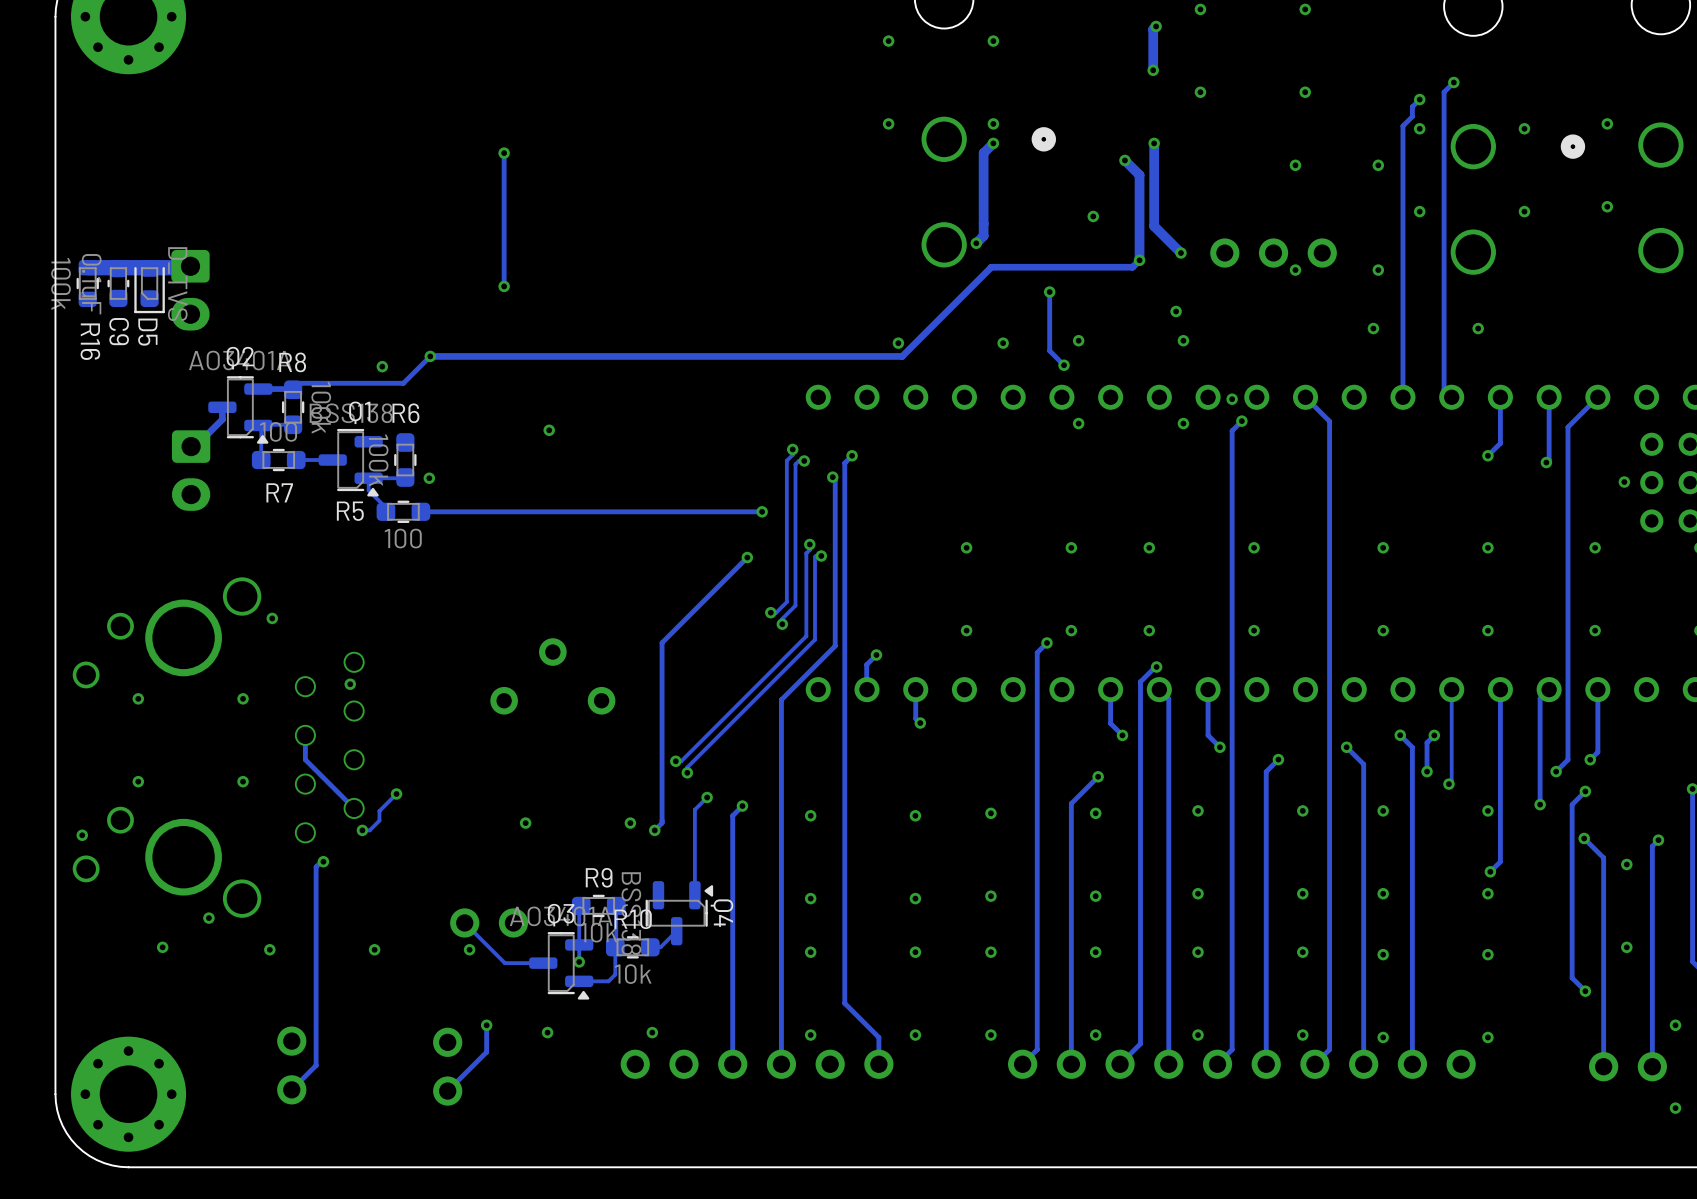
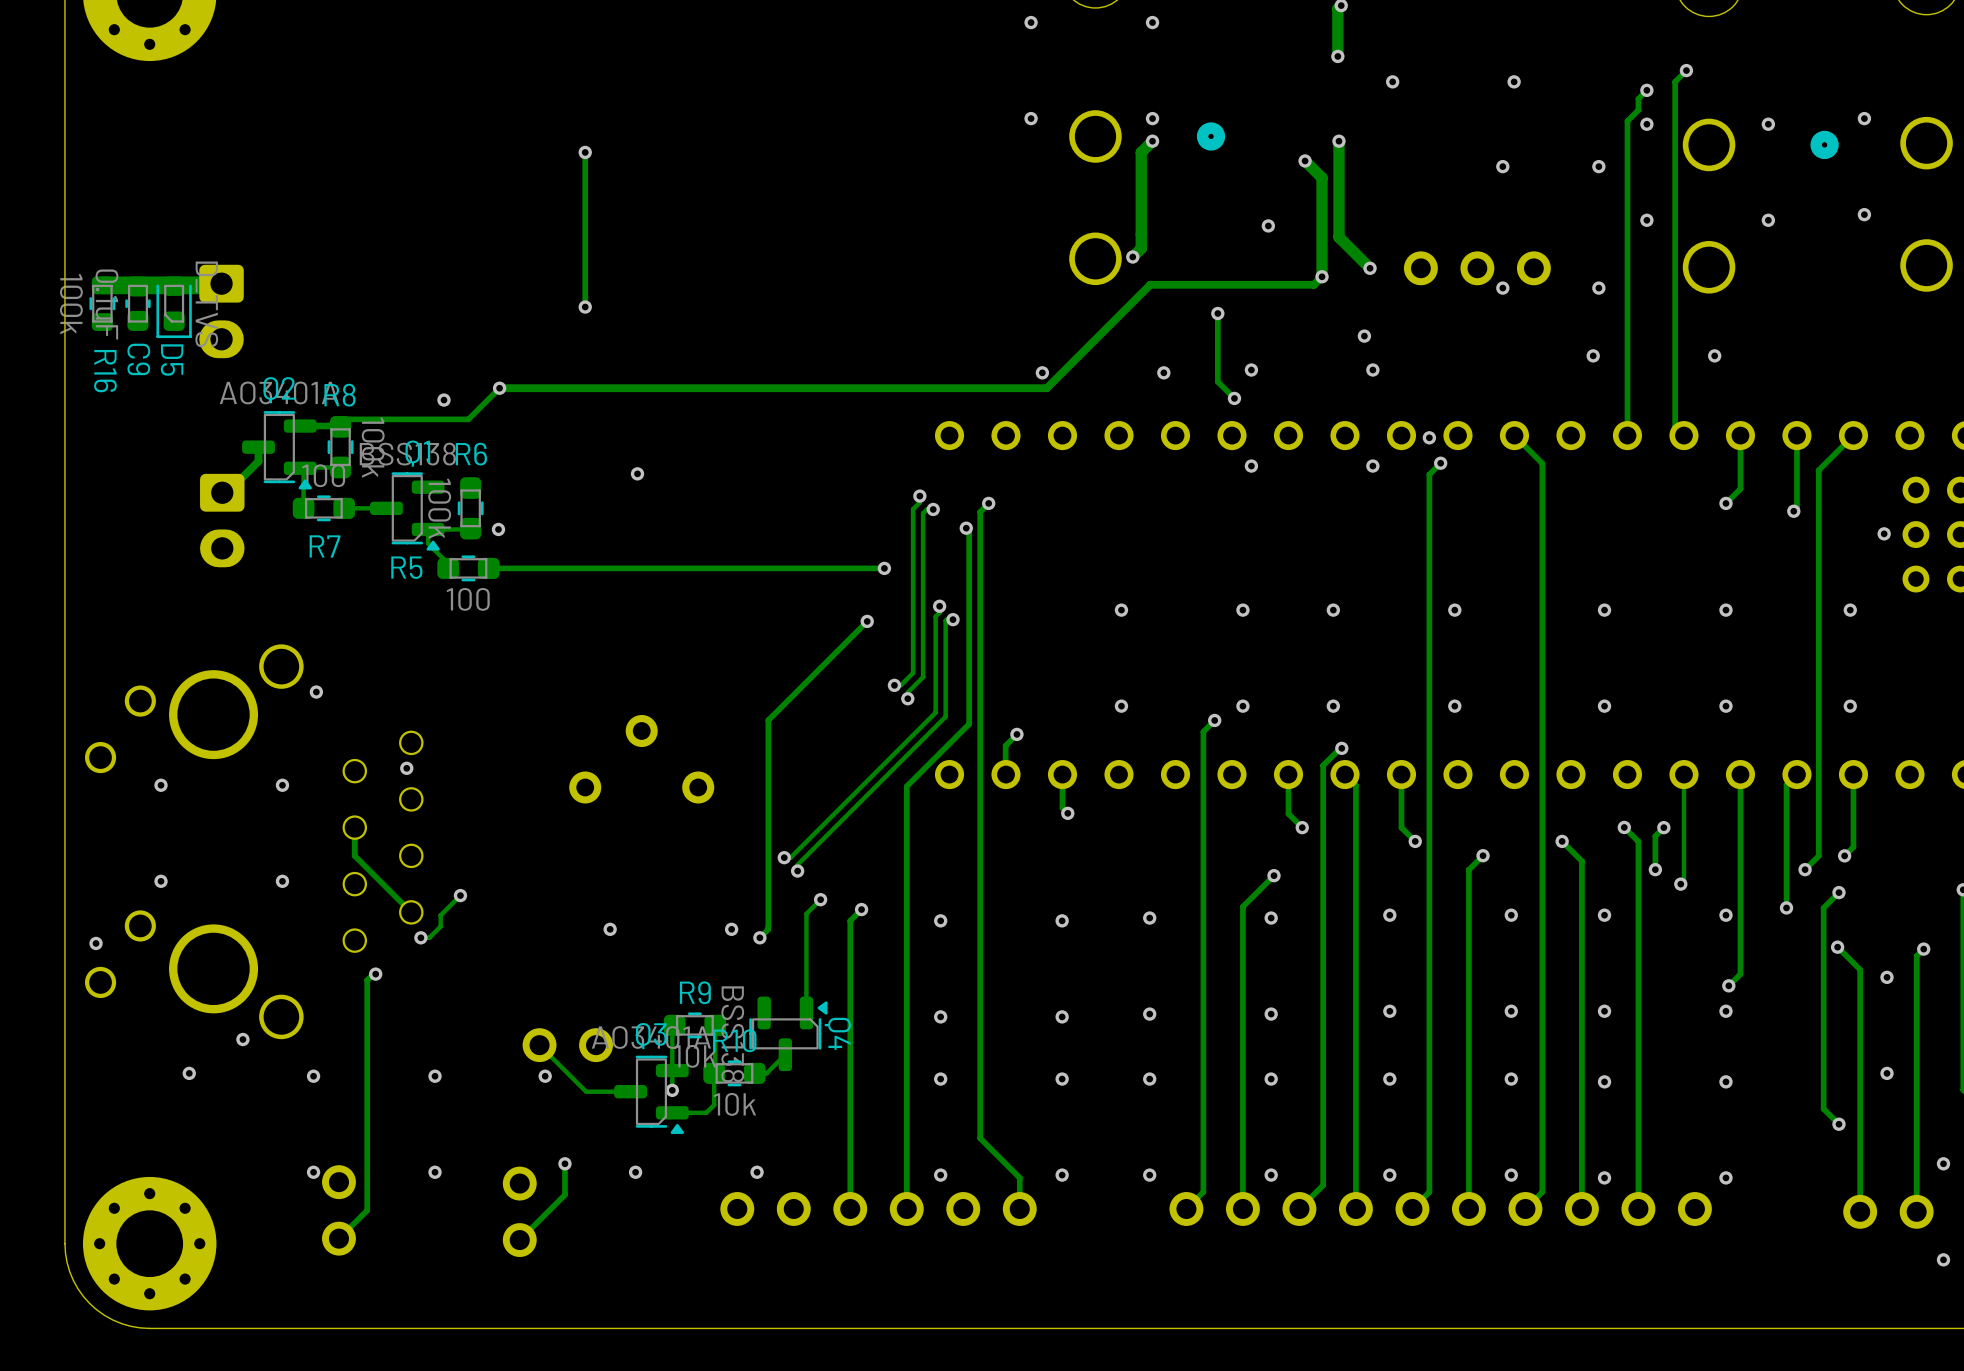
via: none -> (313, 1172)
via: none -> (435, 1172)

